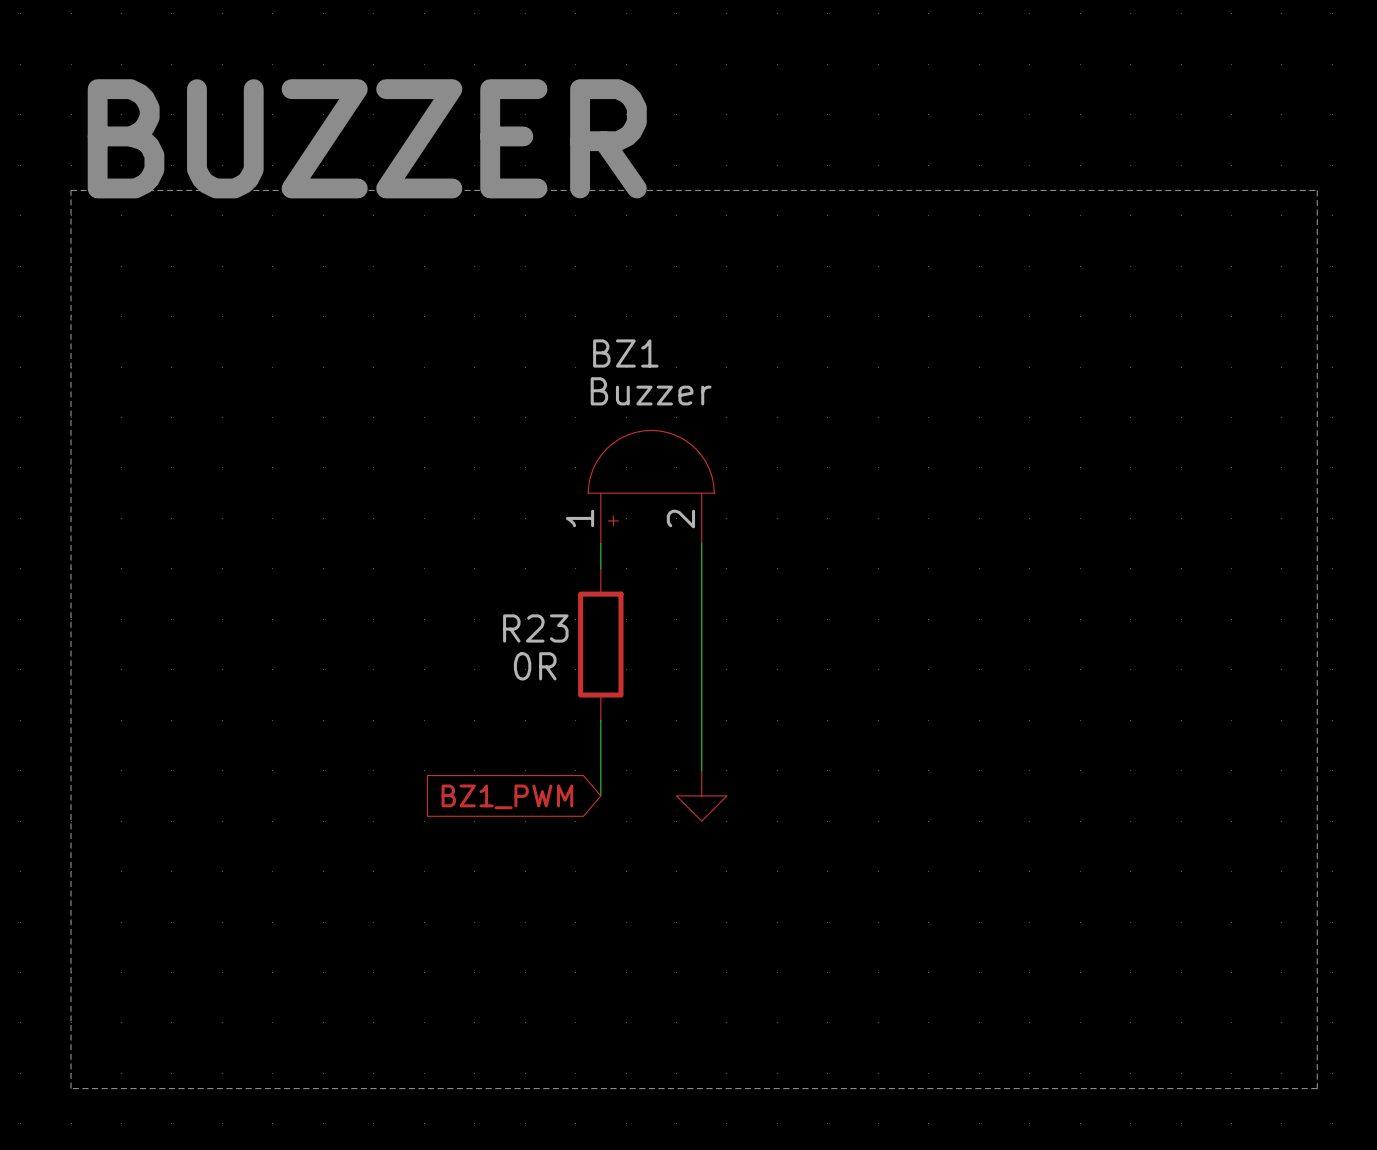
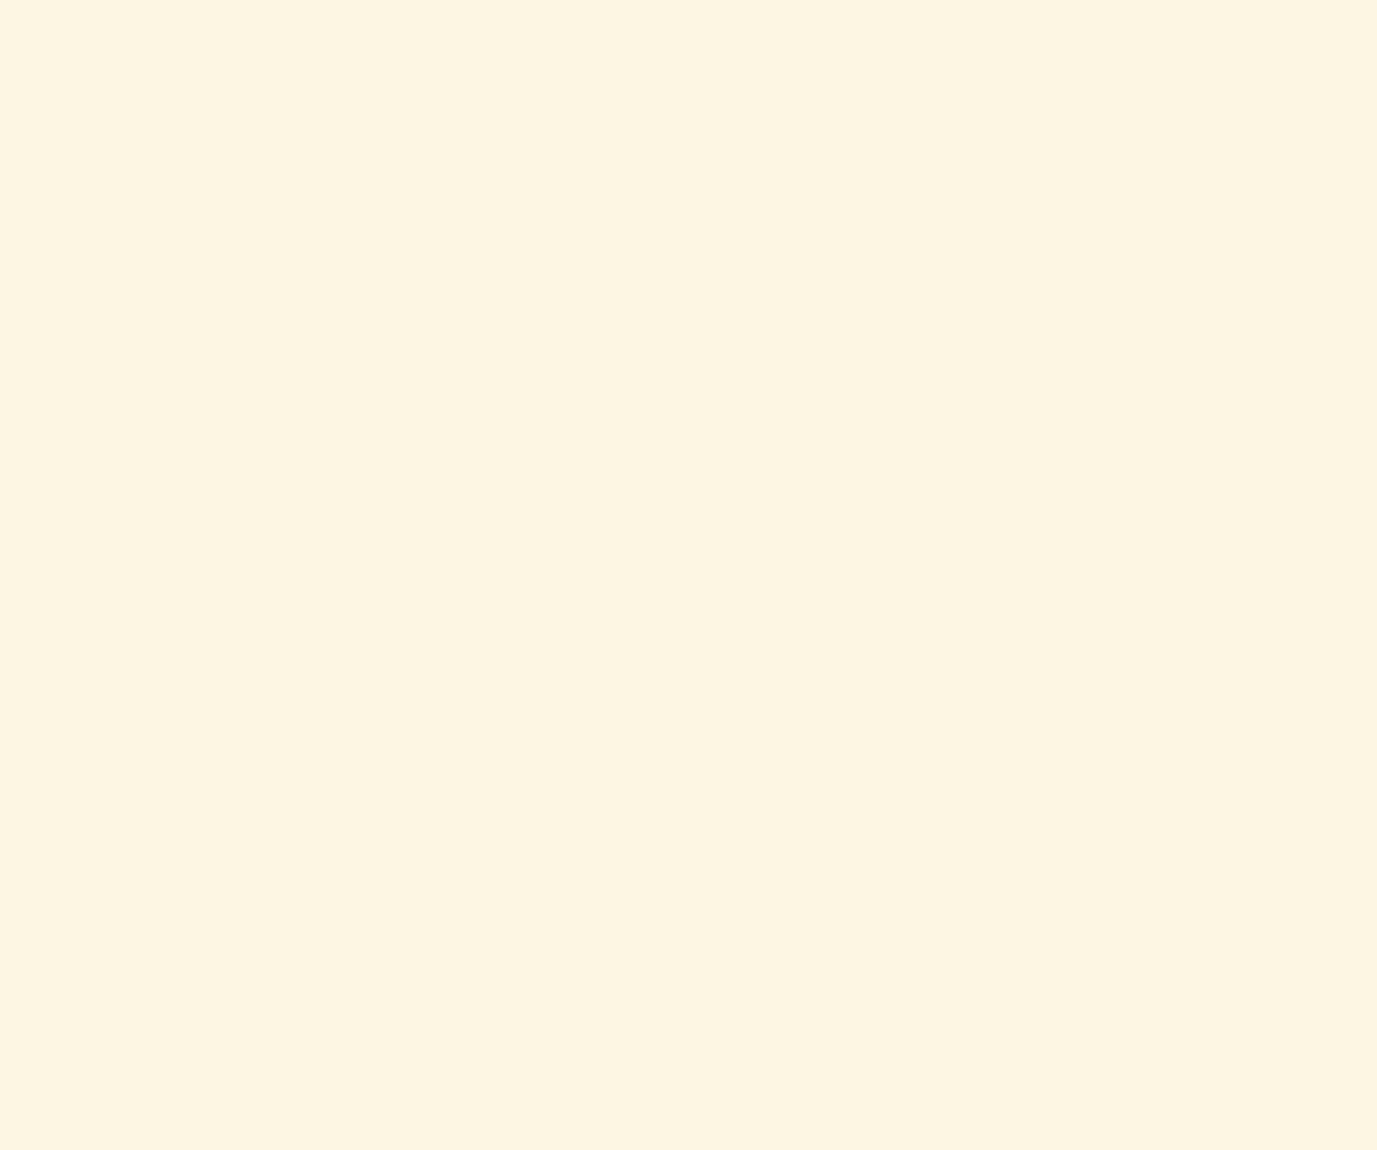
text: BUZZER (367, 138) -> none
line: (71, 190) (1317, 190) (1317, 1088) (71, 1088) (71, 190) -> none
BZ1: Buzzer (651, 487) -> none
wire: (600, 543) (600, 568) -> none
wire: (701, 543) (701, 770) -> none
R23: 0R (600, 644) -> none
wire: (600, 720) (600, 795) -> none
power symbol: (701, 795) -> none
global label: BZ1_PWM (507, 796) -> none

